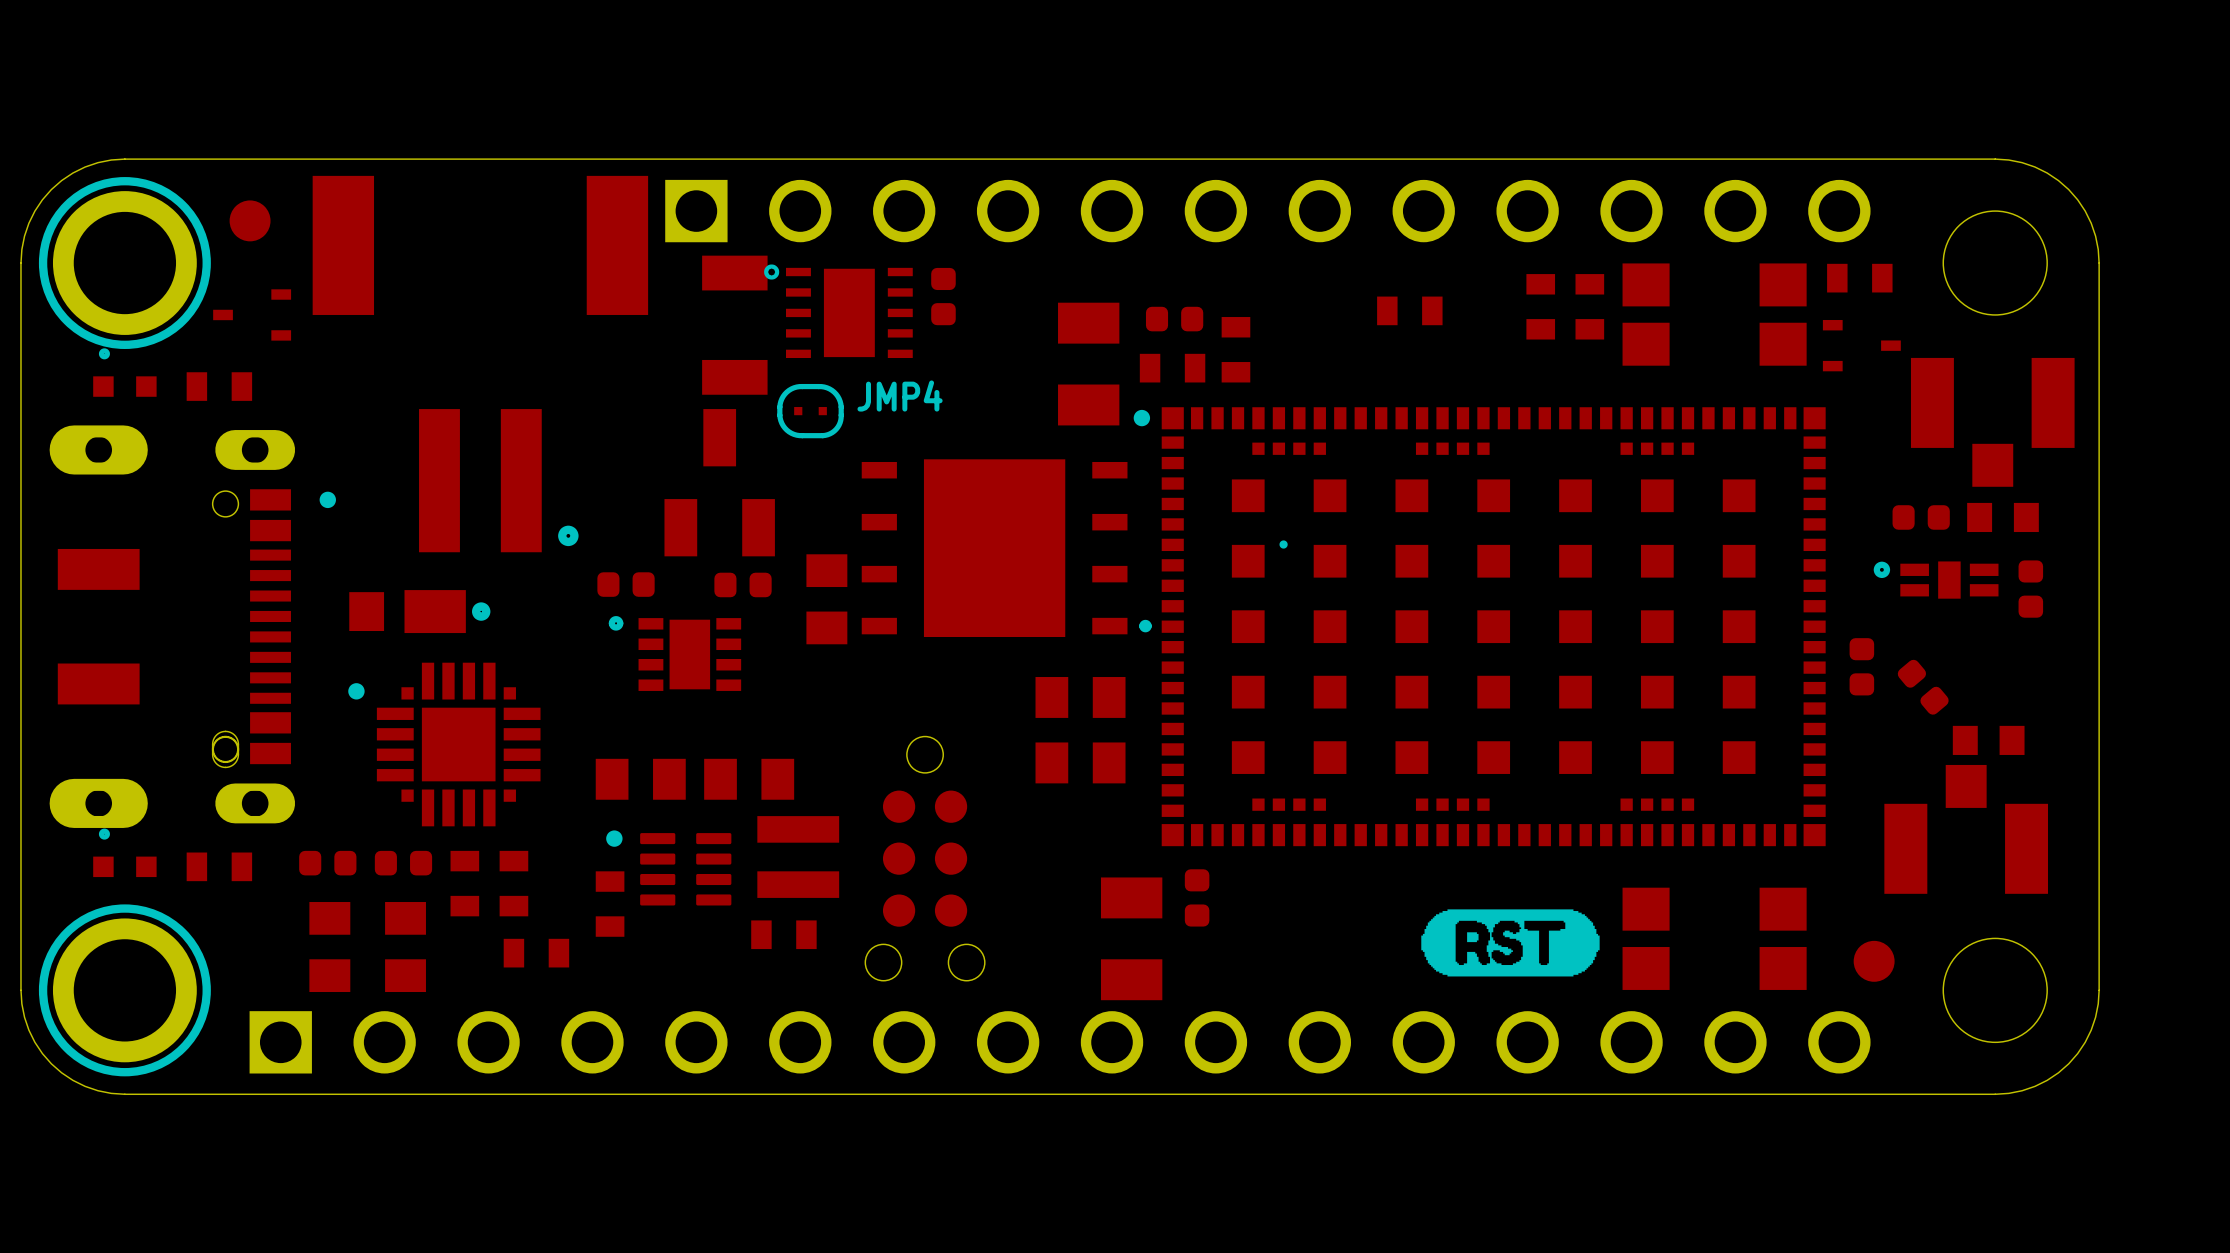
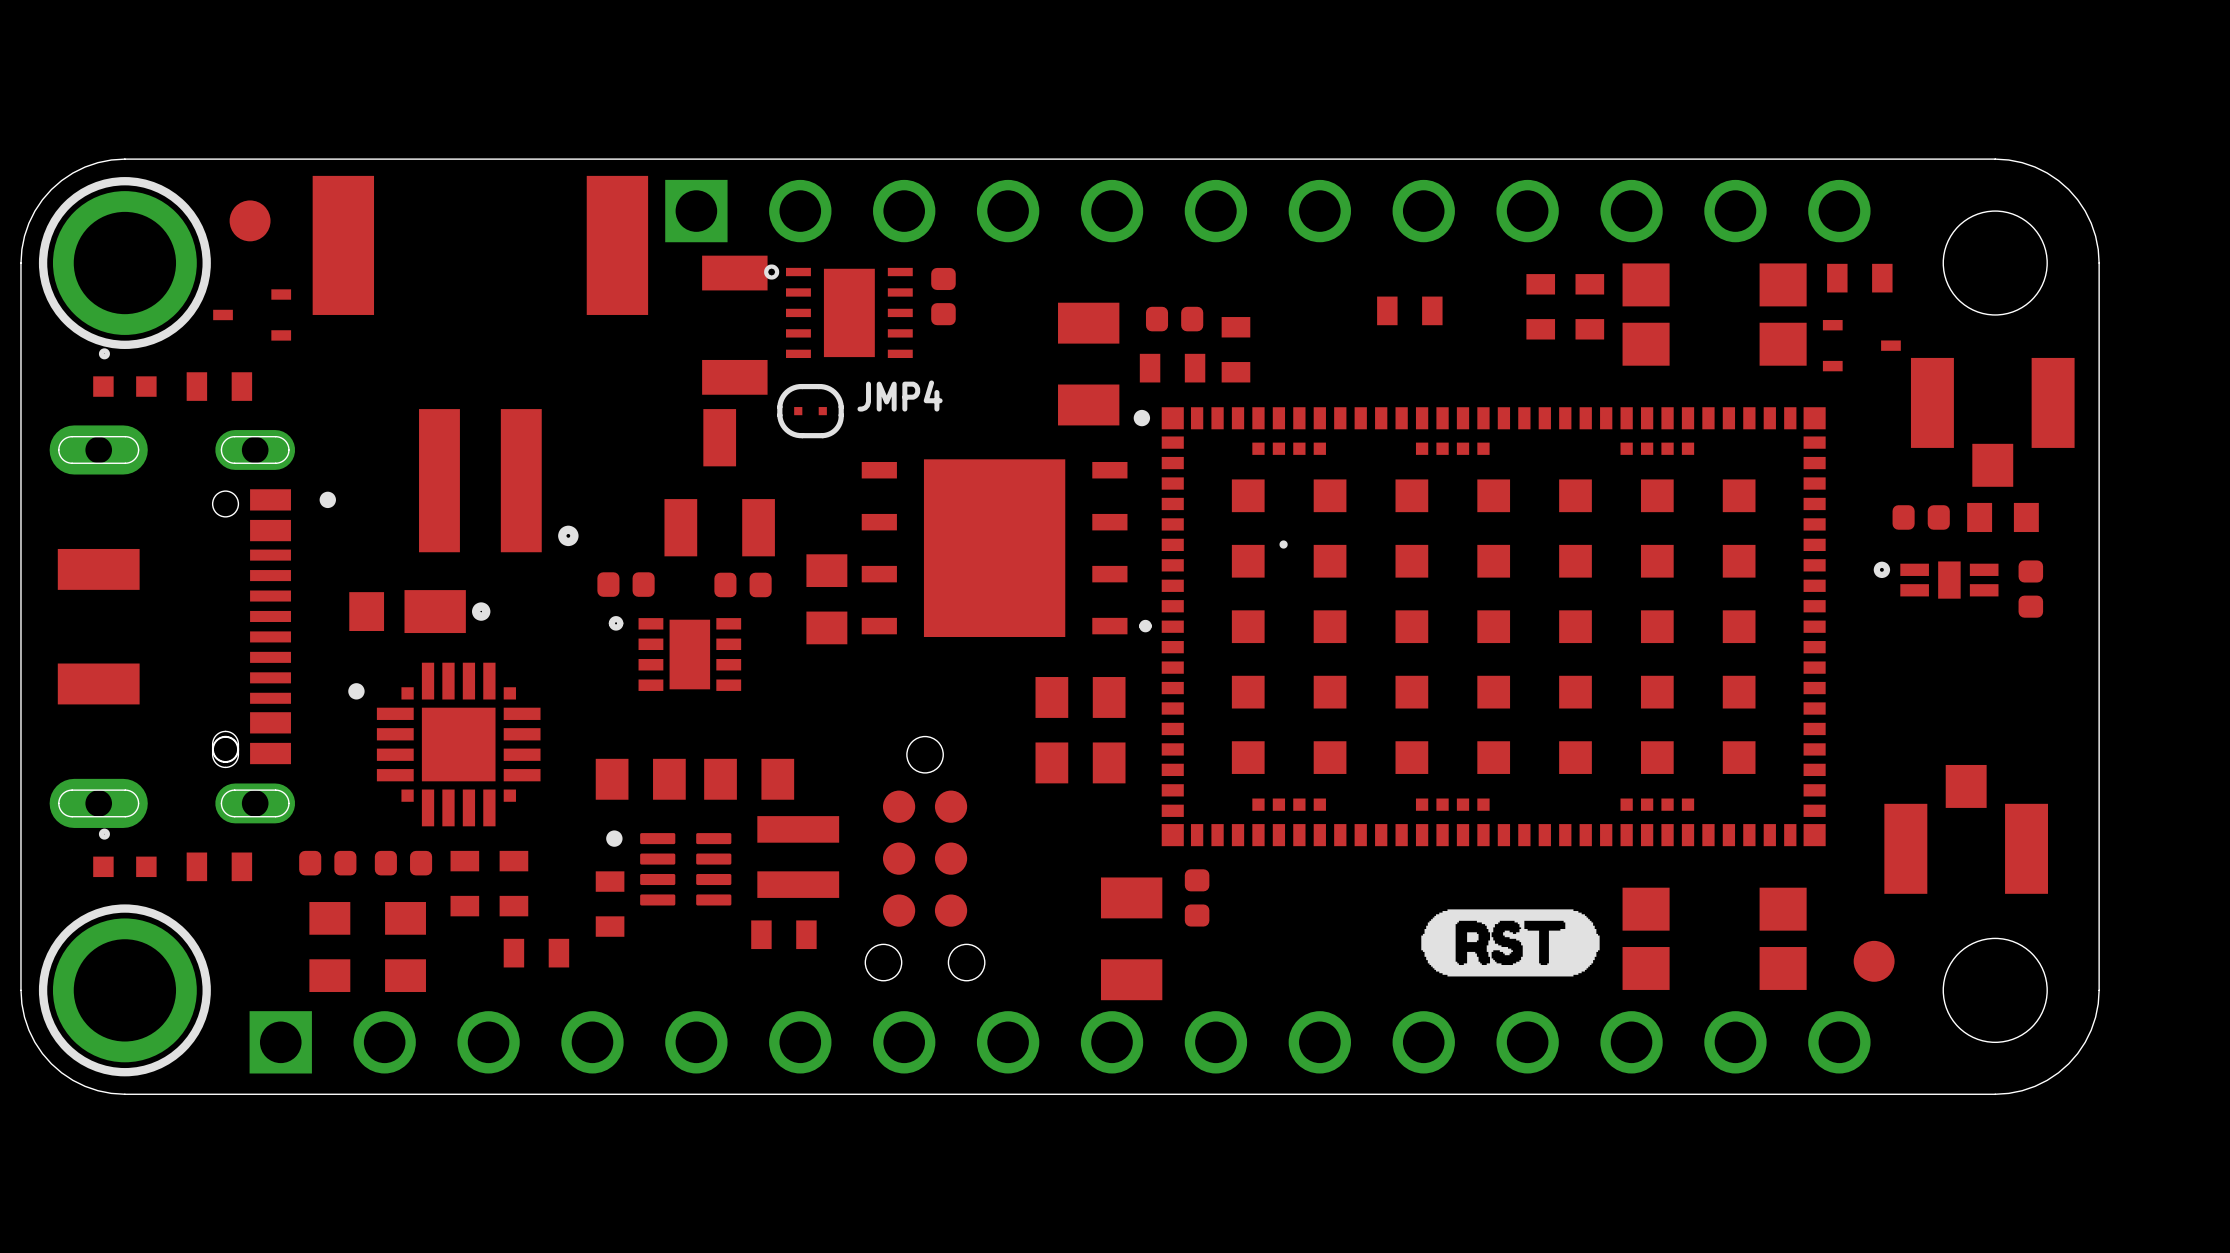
part: (1861, 666) -> none
part: (1923, 687) -> none
part: (1988, 740) -> none

